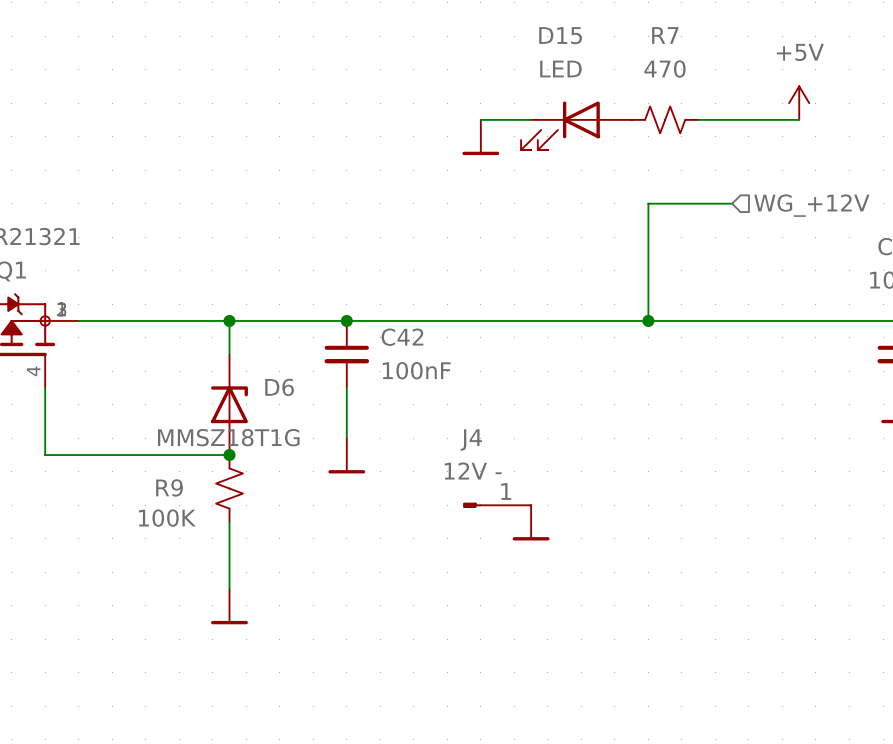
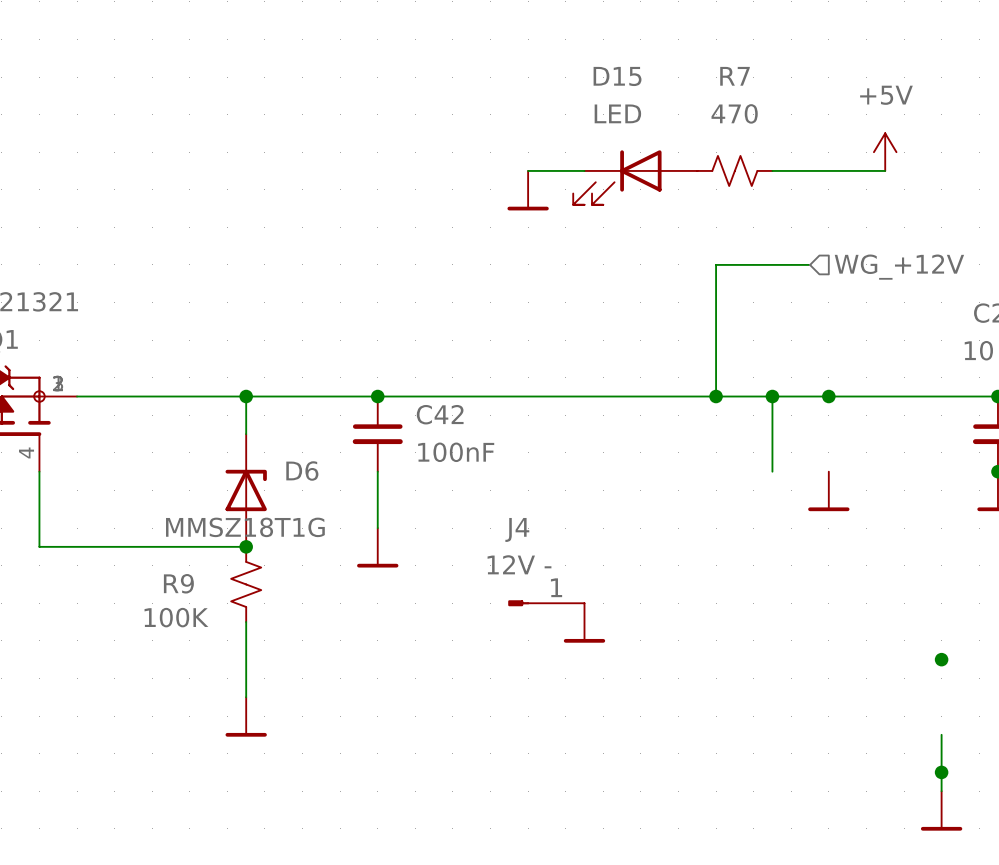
wire: none -> (772, 396) (772, 471)
junction: none -> (772, 396)
junction: none -> (828, 396)
power symbol: none -> (828, 491)
junction: none -> (941, 659)
wire: none -> (941, 734) (941, 791)
junction: none -> (941, 772)
power symbol: none -> (941, 810)

